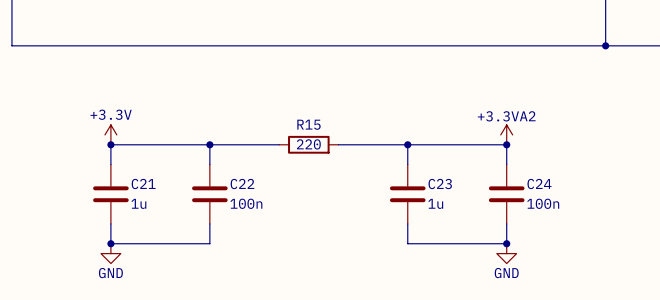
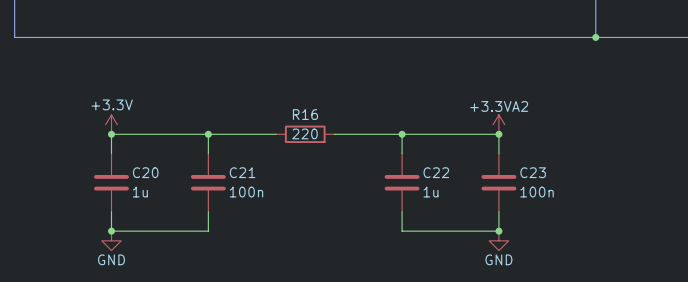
R15 name: R15 (308, 124) -> R16 (305, 114)
C21 name: C21 (143, 184) -> C20 (145, 172)
C22 name: C22 (242, 184) -> C21 (242, 172)
C23 name: C23 (440, 184) -> C22 (436, 172)
C24 name: C24 (539, 184) -> C23 (533, 172)

